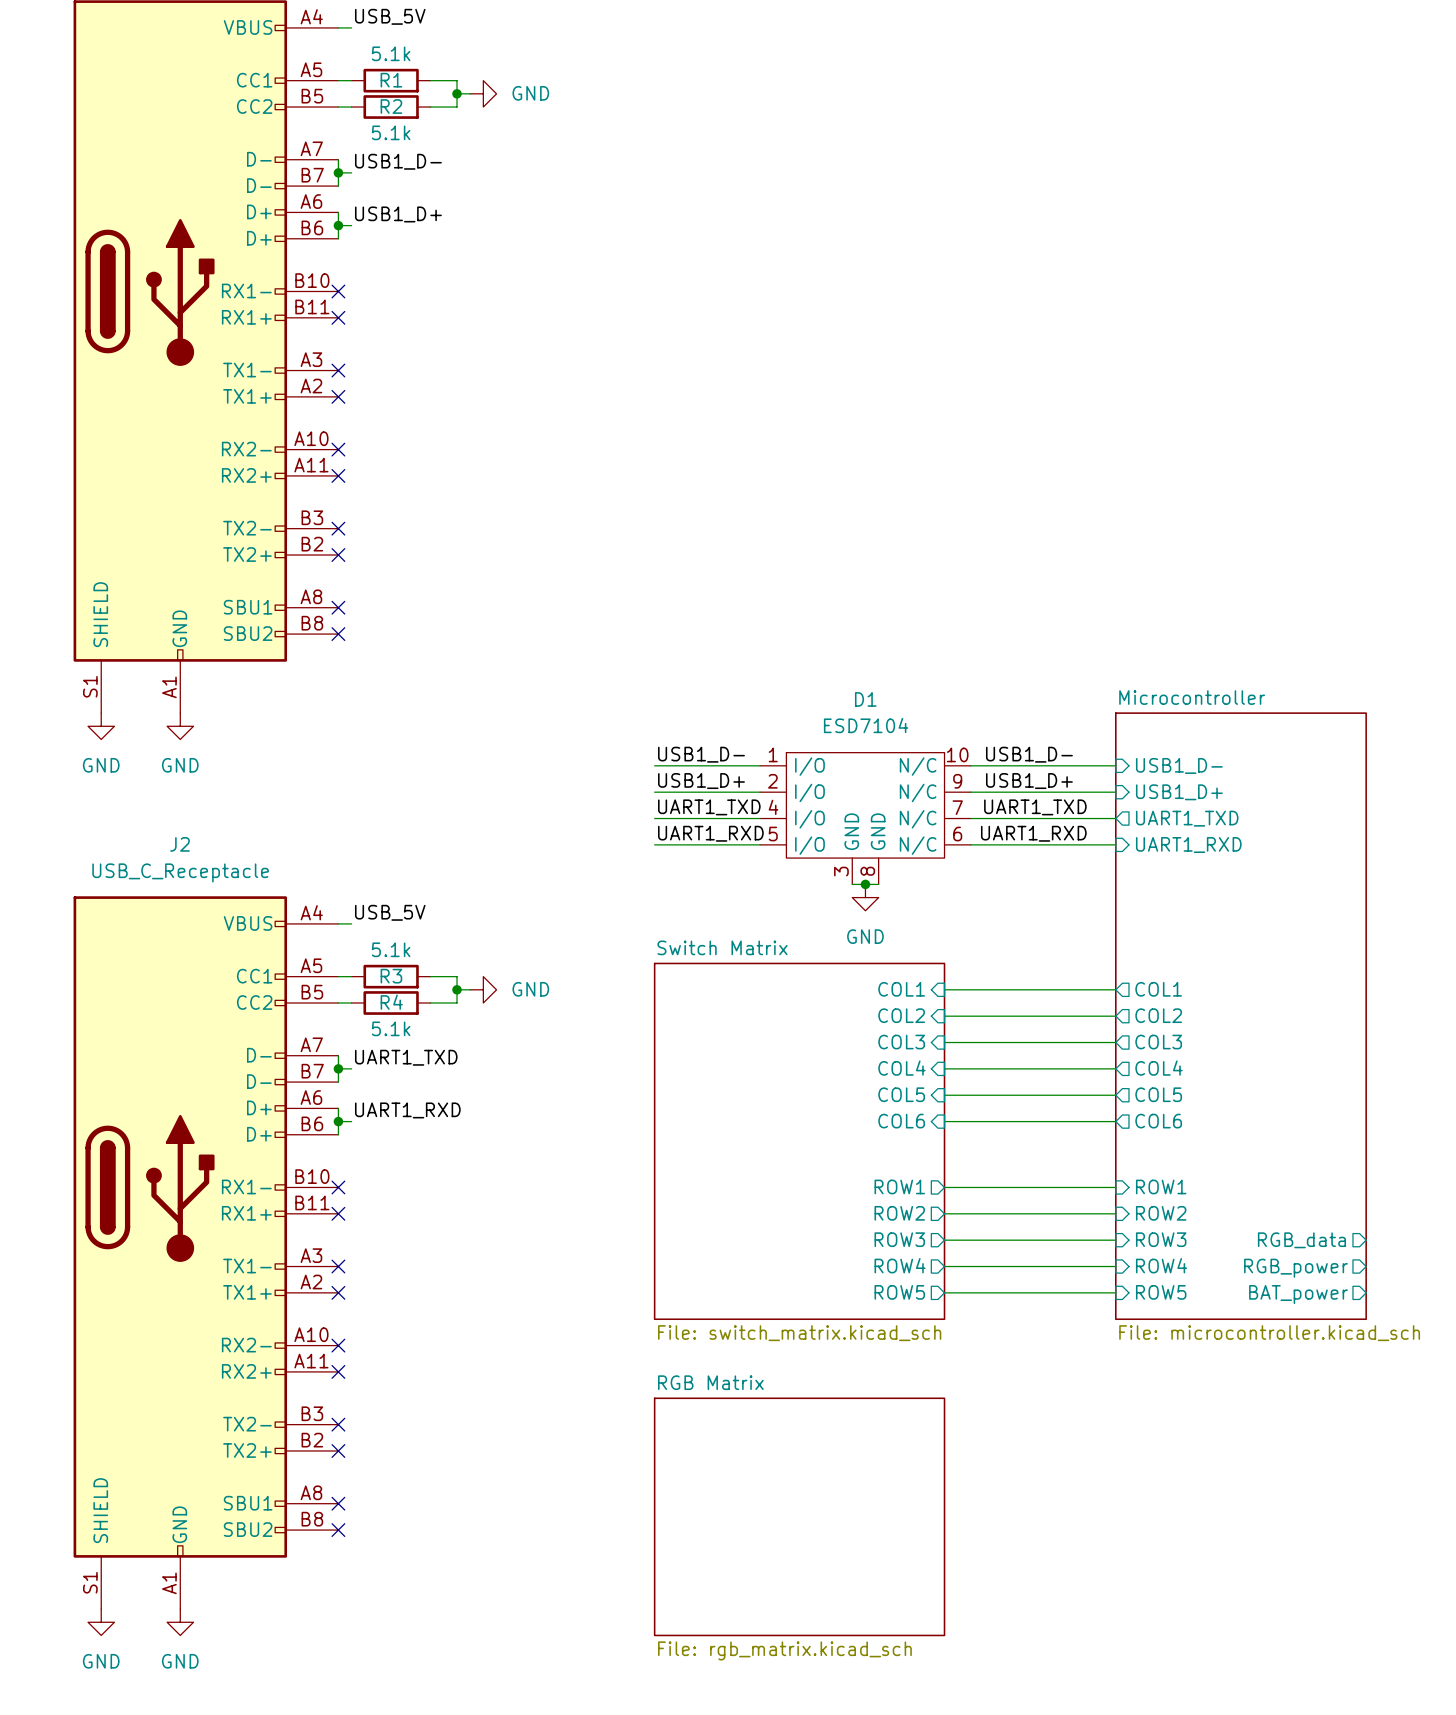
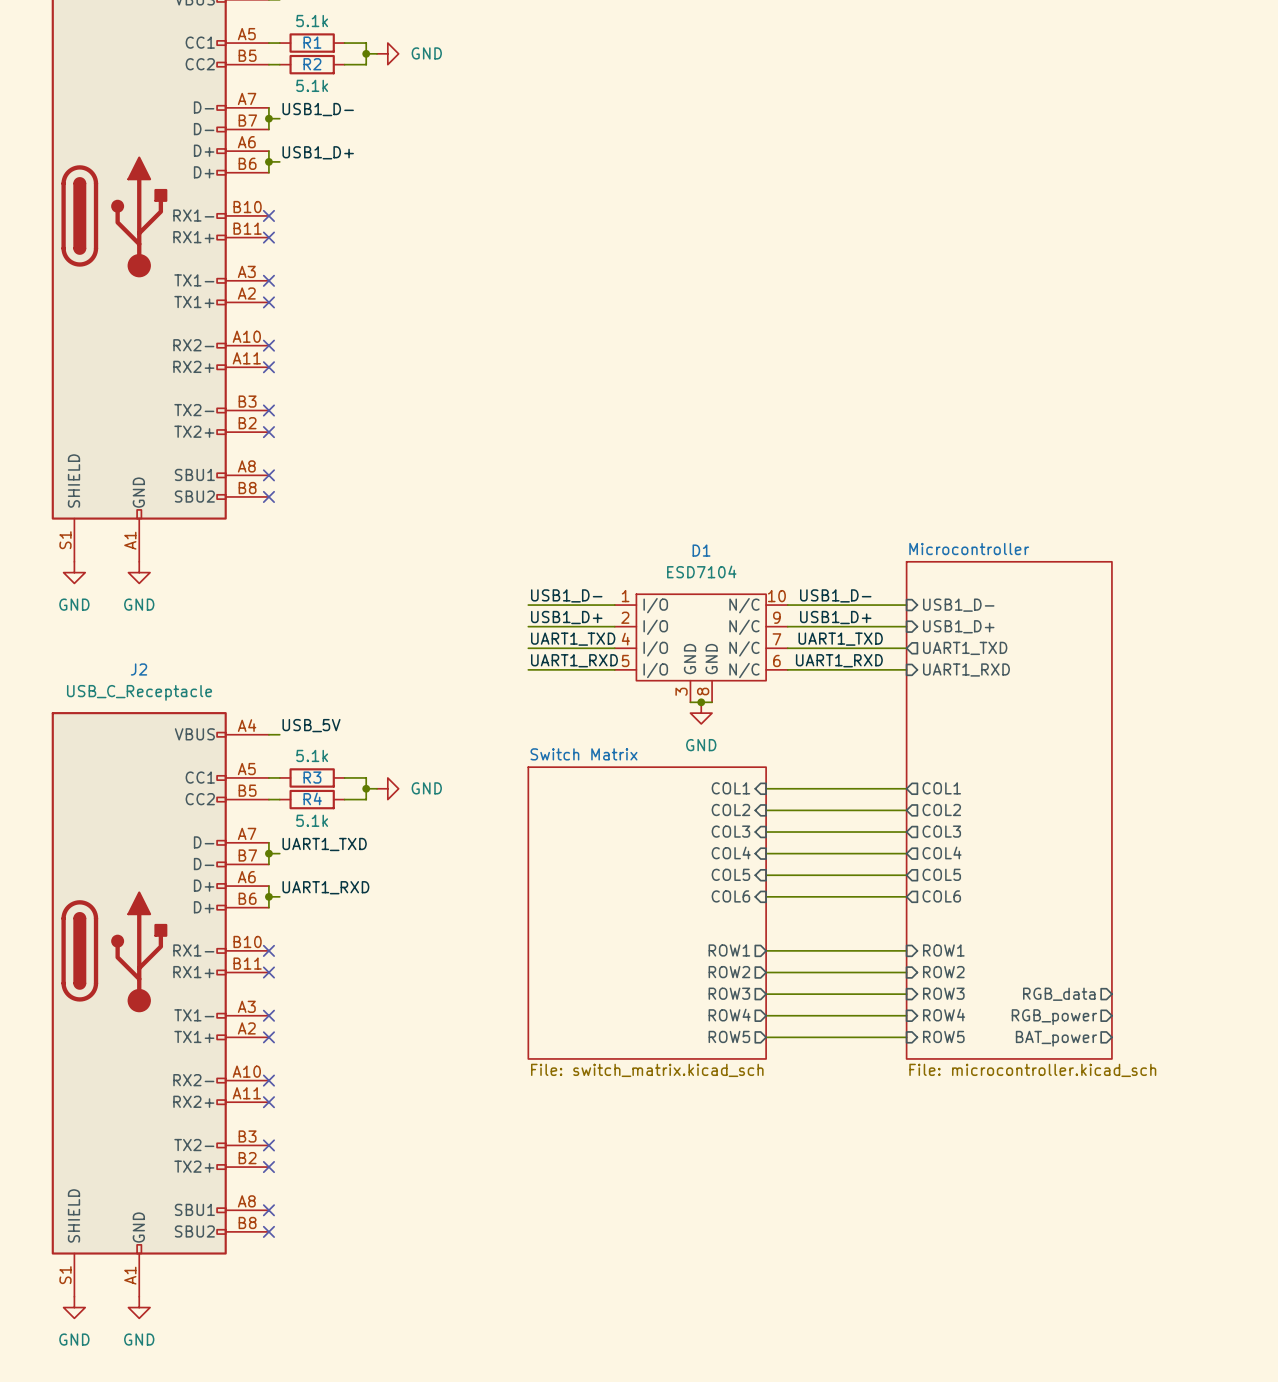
sheet RGB Matrix: File: rgb_matrix.kicad_sch (799, 1516) -> none

